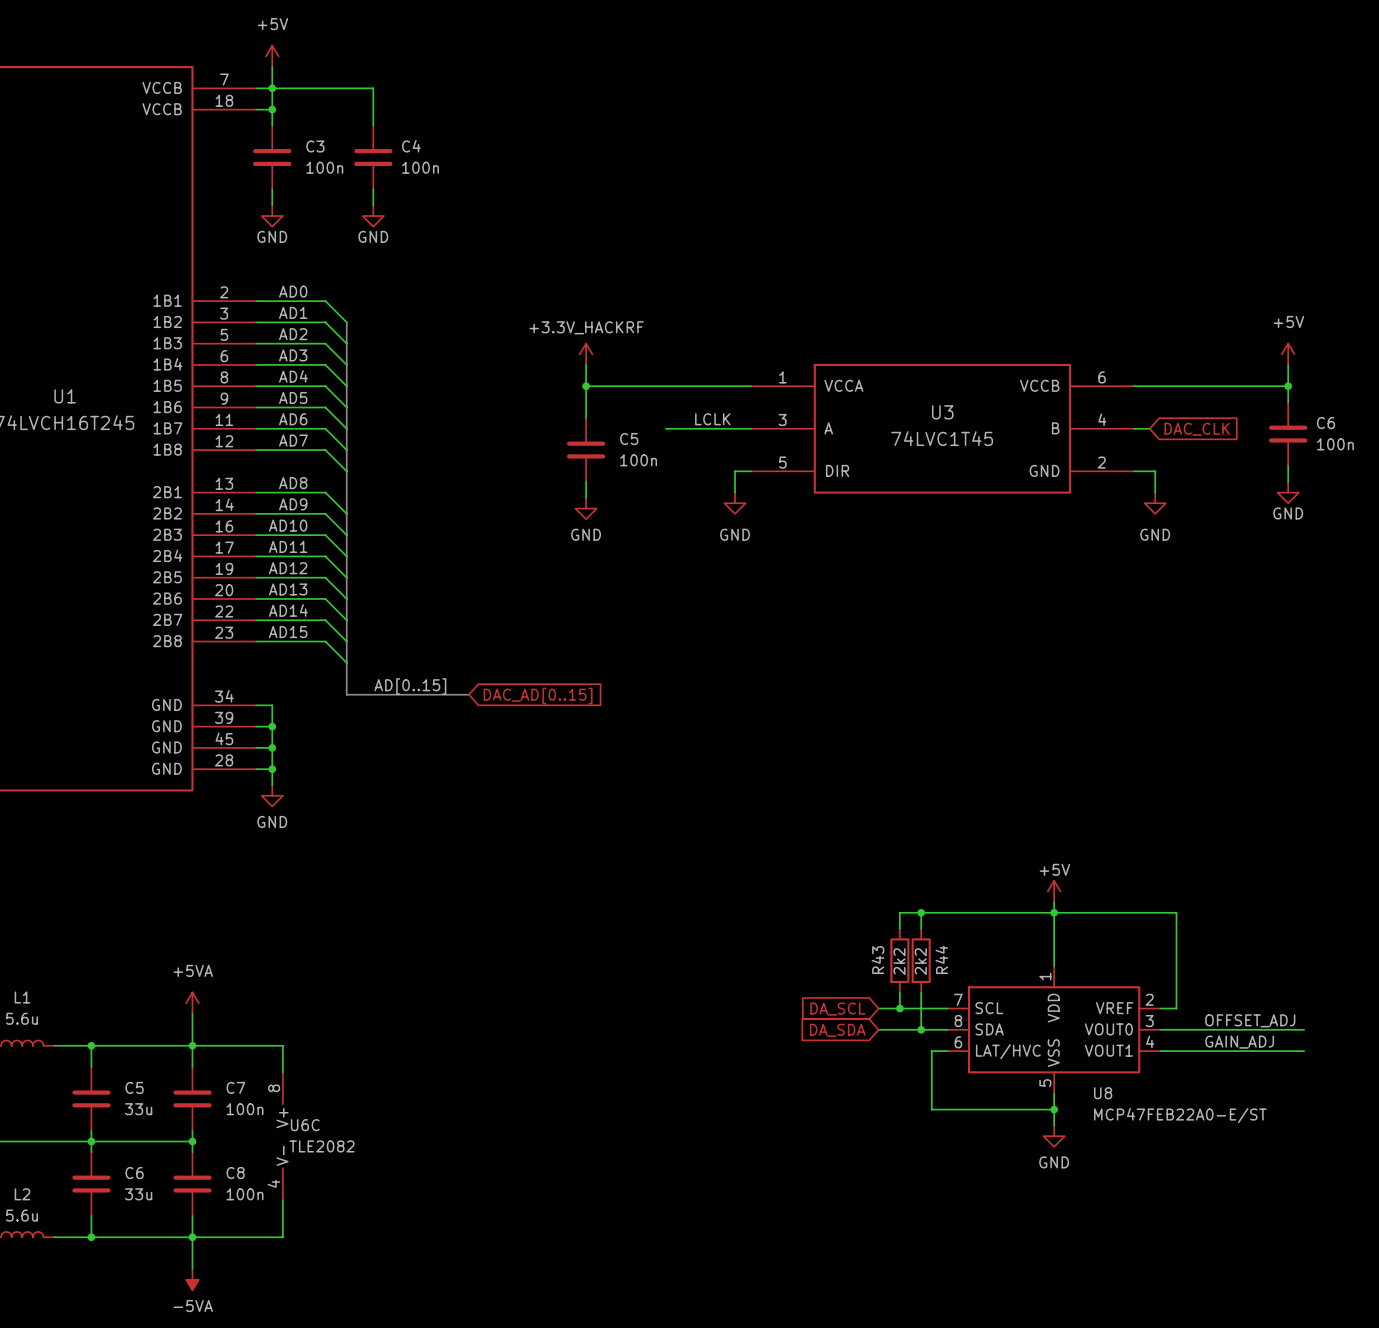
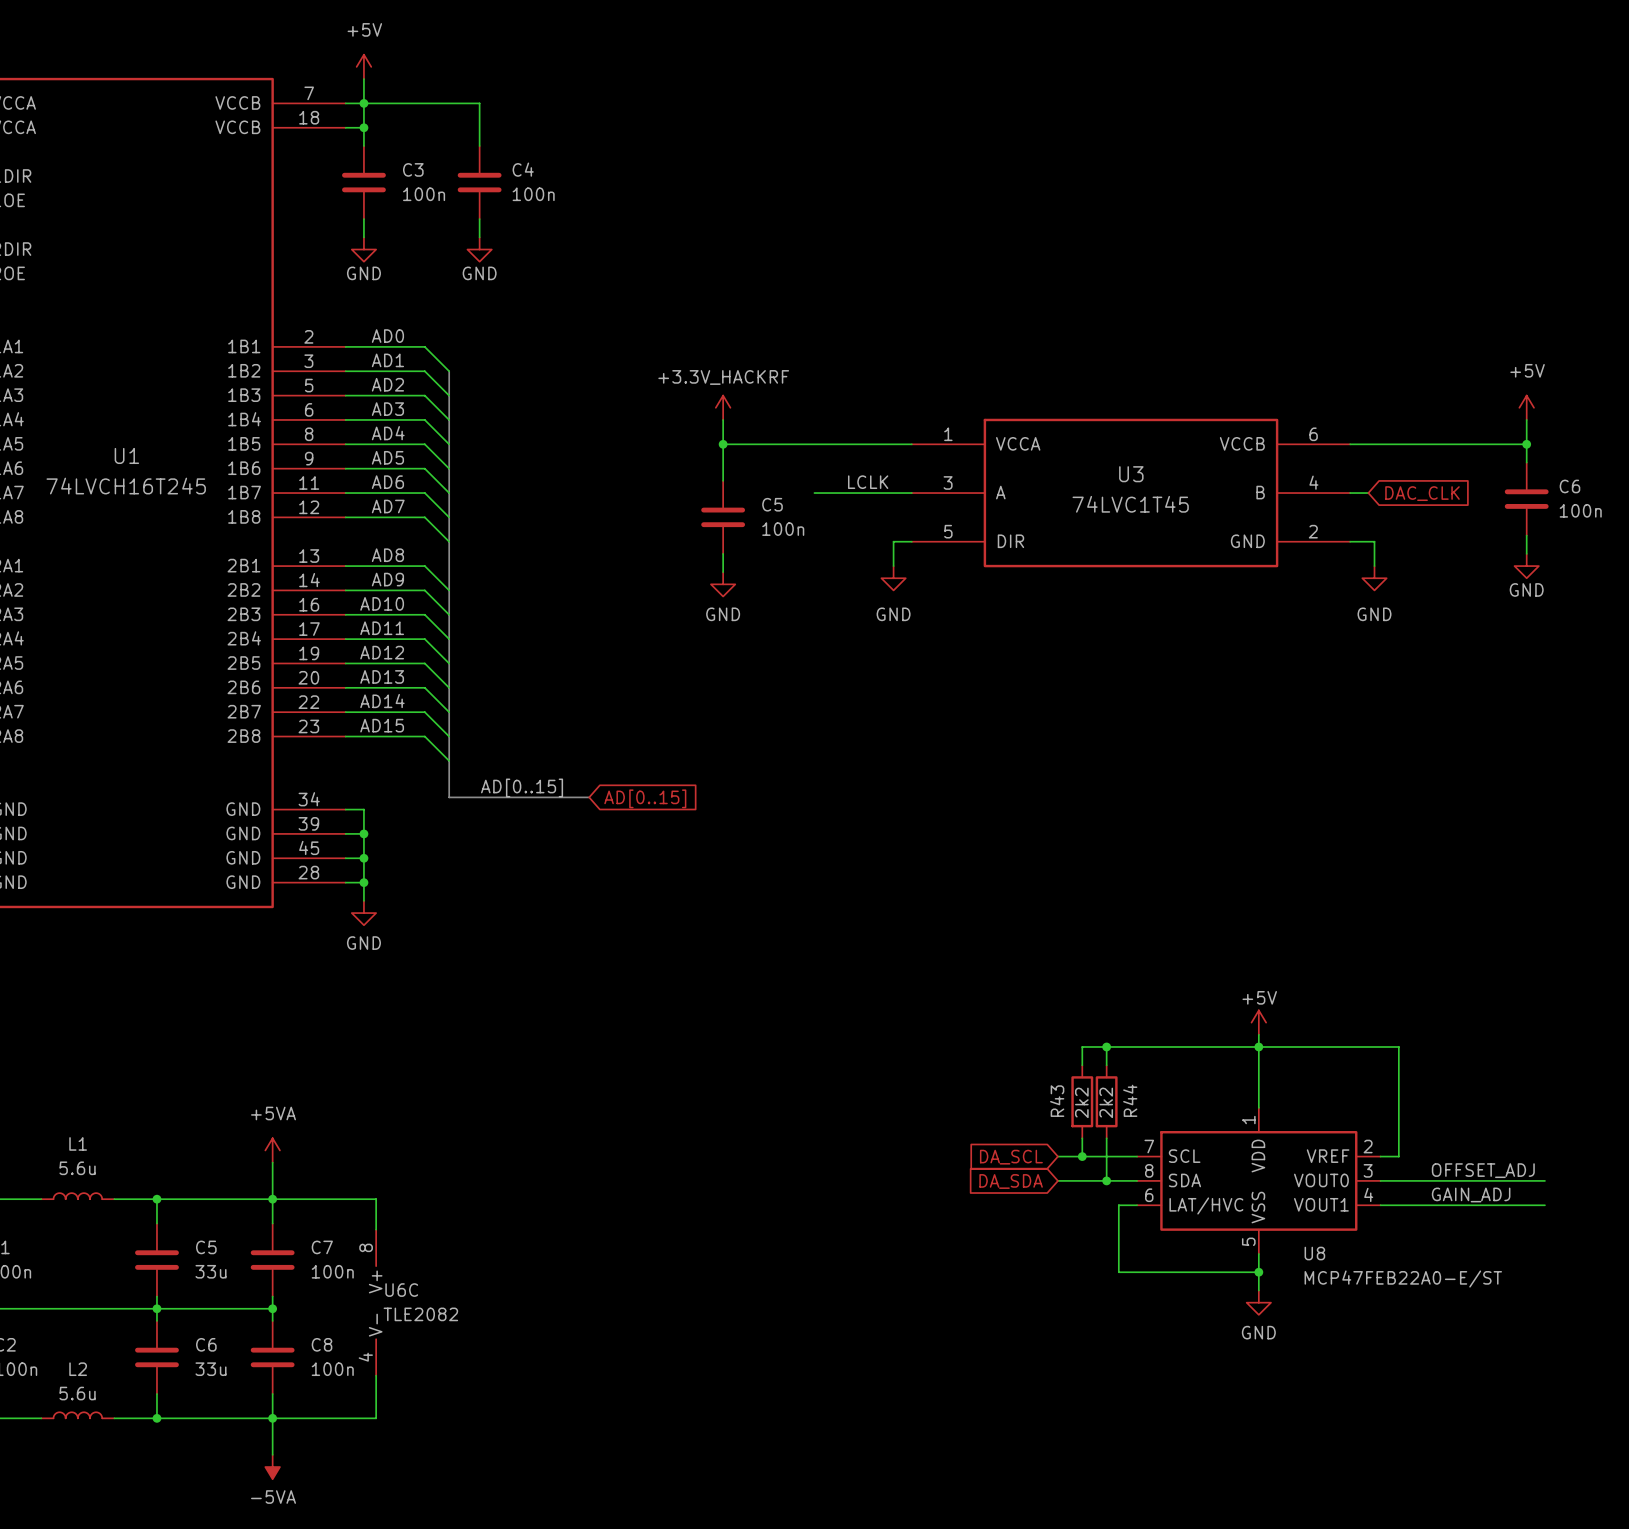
global label: DAC_AD[0..15] (538, 695) -> AD[0..15] (645, 798)

